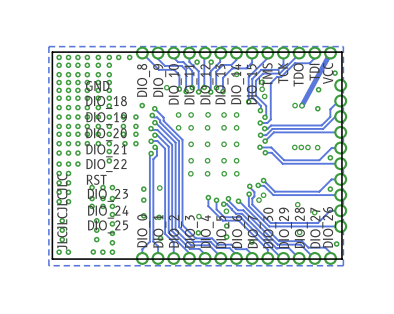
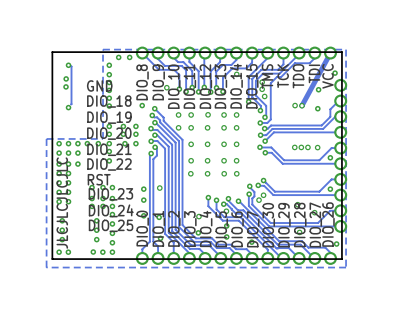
zone outline: (343, 46) (343, 265) (48, 265) (48, 46) (343, 46) -> (346, 49) (346, 267) (46, 267) (46, 138) (103, 138) (103, 49) (346, 49)
via: (59, 57) -> none
via: (68, 57) -> none
via: (77, 57) -> none
via: (87, 57) -> none
via: (98, 57) -> none
via: (109, 57) -> none
via: (197, 62) -> none
via: (211, 62) -> none
via: (59, 65) -> none
via: (77, 65) -> none
via: (87, 65) -> none
via: (98, 65) -> none
track: none -> (71, 66) (71, 104)
via: (59, 74) -> none
via: (68, 74) -> none
via: (77, 74) -> none
via: (87, 74) -> none
via: (98, 74) -> none
via: none -> (66, 78)
via: (59, 82) -> none
via: (68, 82) -> none
via: (77, 82) -> none
via: (87, 82) -> none
via: (98, 82) -> none
via: none -> (66, 86)
via: (59, 90) -> none
via: (68, 90) -> none
via: (77, 90) -> none
via: (87, 90) -> none
via: (98, 90) -> none
via: (59, 98) -> none
via: (68, 98) -> none
via: (77, 98) -> none
via: (87, 98) -> none
via: (98, 98) -> none
via: (59, 107) -> none
via: (77, 107) -> none
via: (87, 107) -> none
via: (98, 107) -> none
via: (59, 117) -> none
via: (68, 117) -> none
via: (77, 117) -> none
via: (87, 117) -> none
via: (98, 117) -> none
via: (109, 117) -> none
via: (123, 117) -> none
via: (135, 117) -> none
via: (59, 126) -> none
via: (68, 126) -> none
via: (77, 126) -> none
via: (87, 126) -> none
via: (98, 126) -> none
via: (59, 134) -> none
via: (68, 134) -> none
via: (77, 134) -> none
via: (87, 134) -> none
via: (98, 134) -> none

